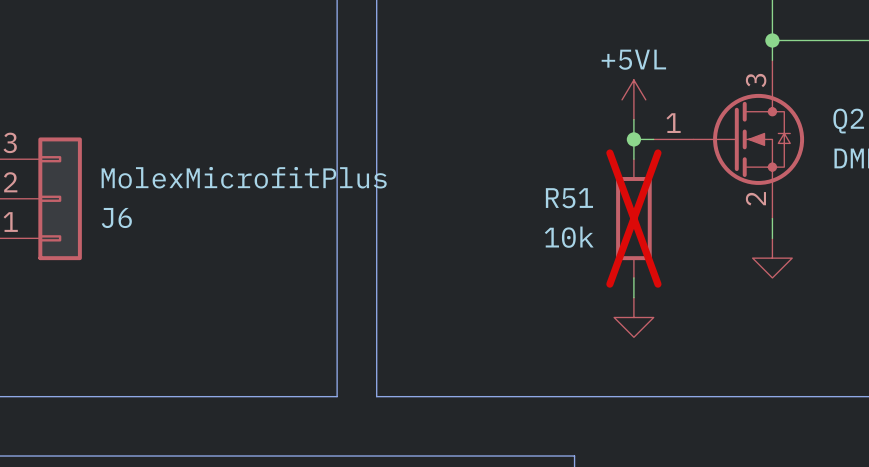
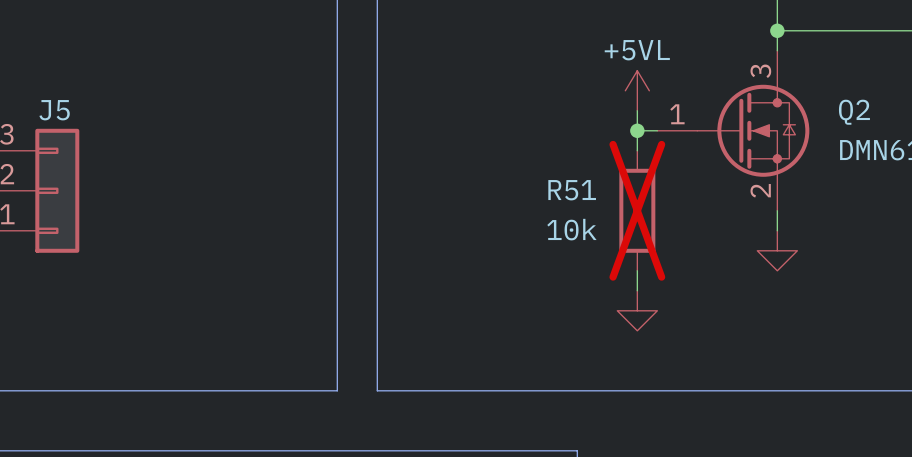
J6 value: MolexMicrofitPlus (244, 177) -> none
J6 name: J6 (116, 218) -> J5 (54, 110)

